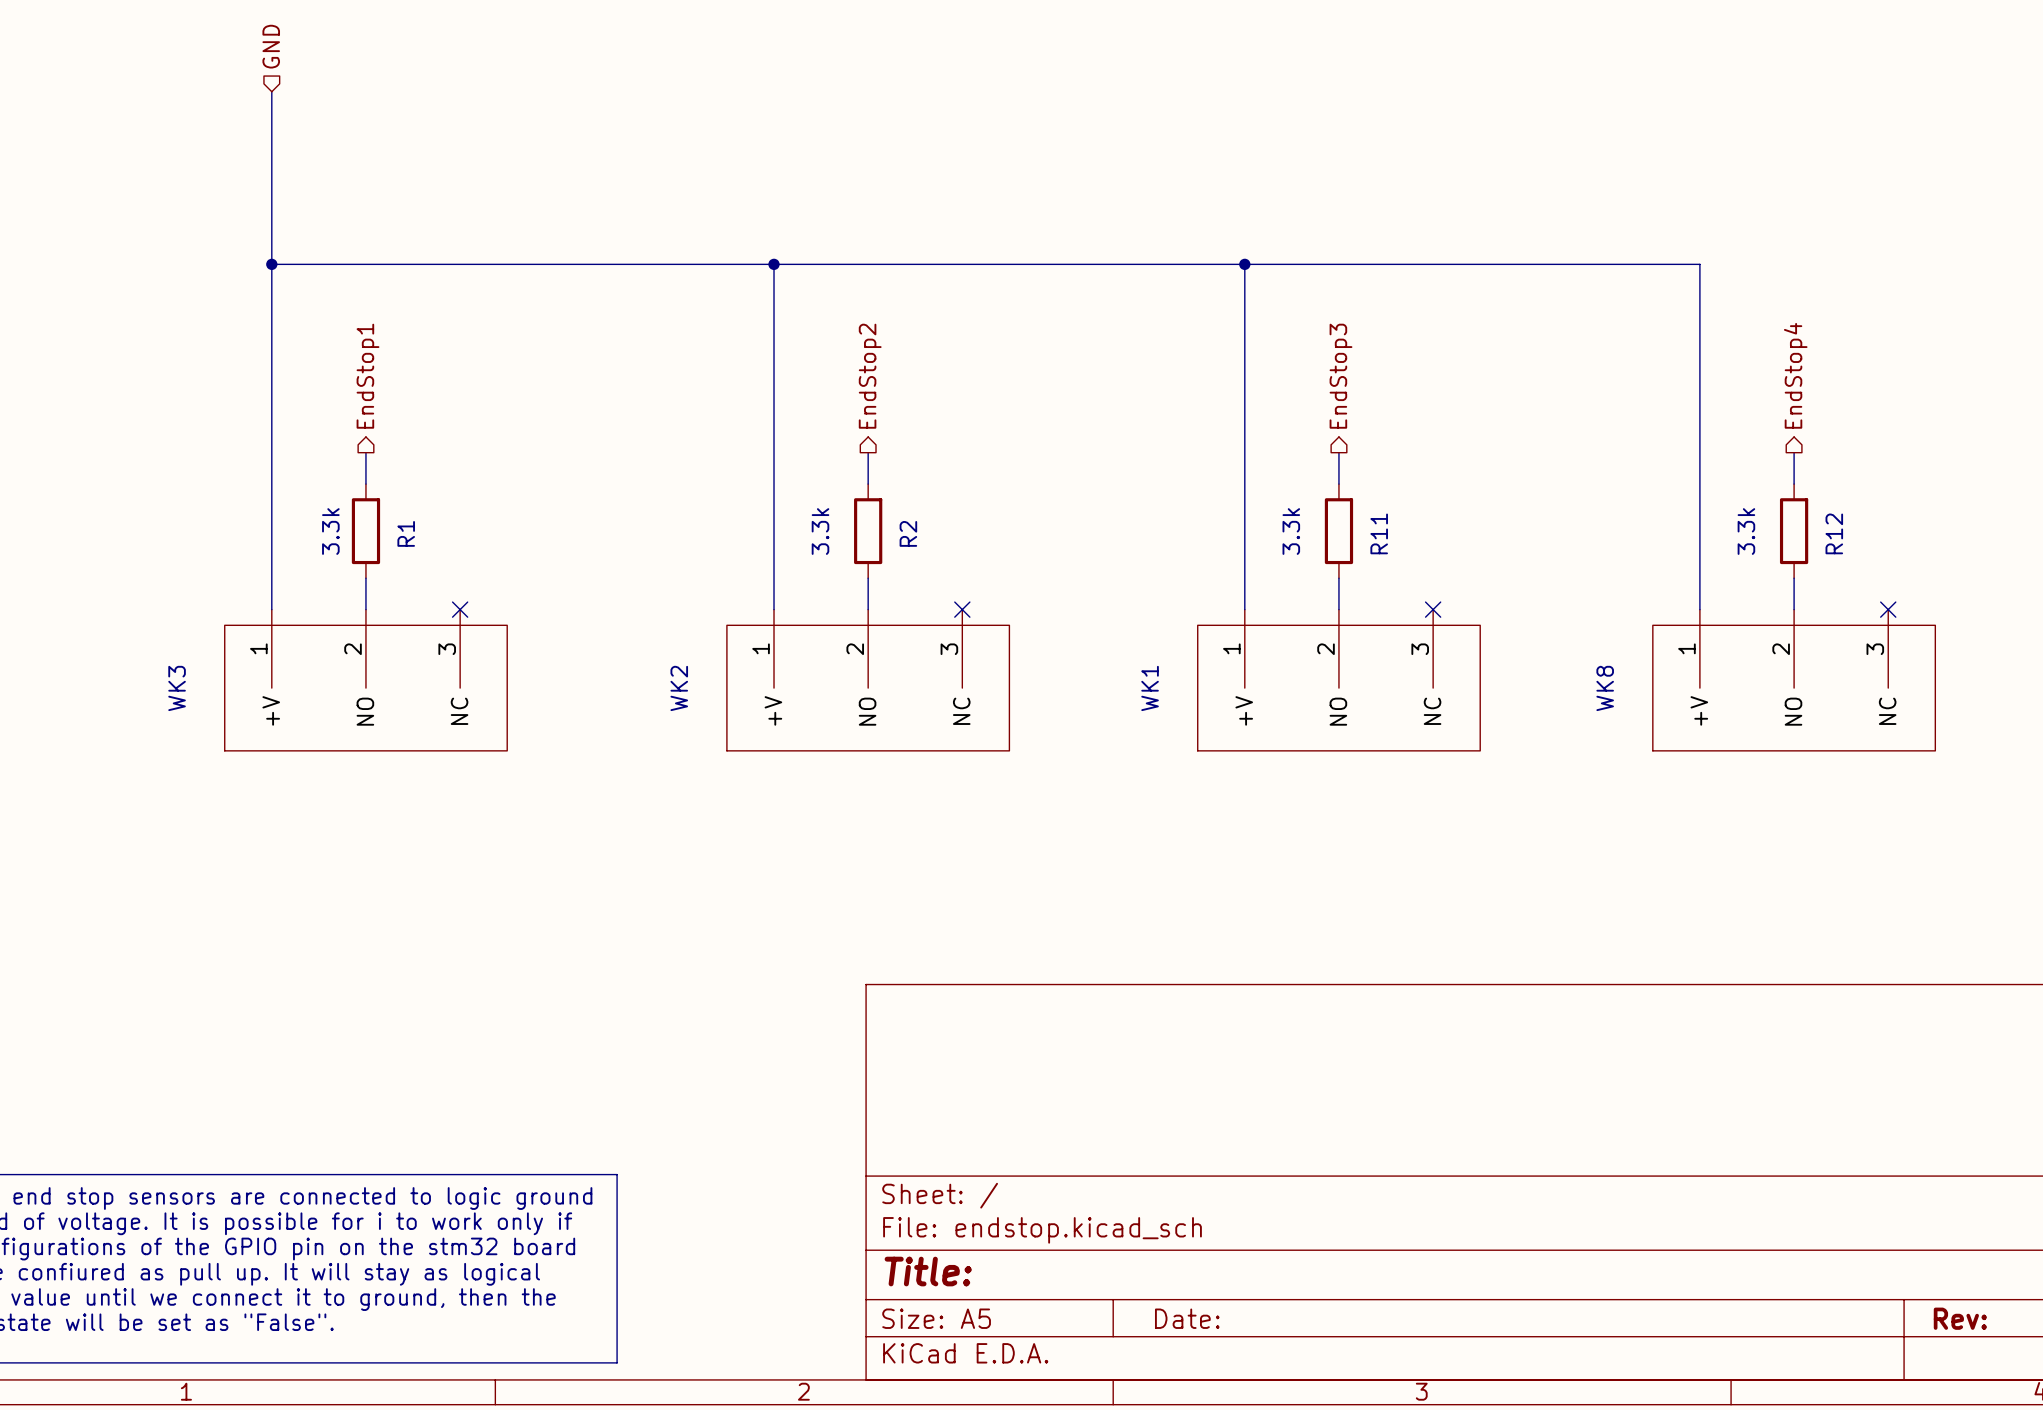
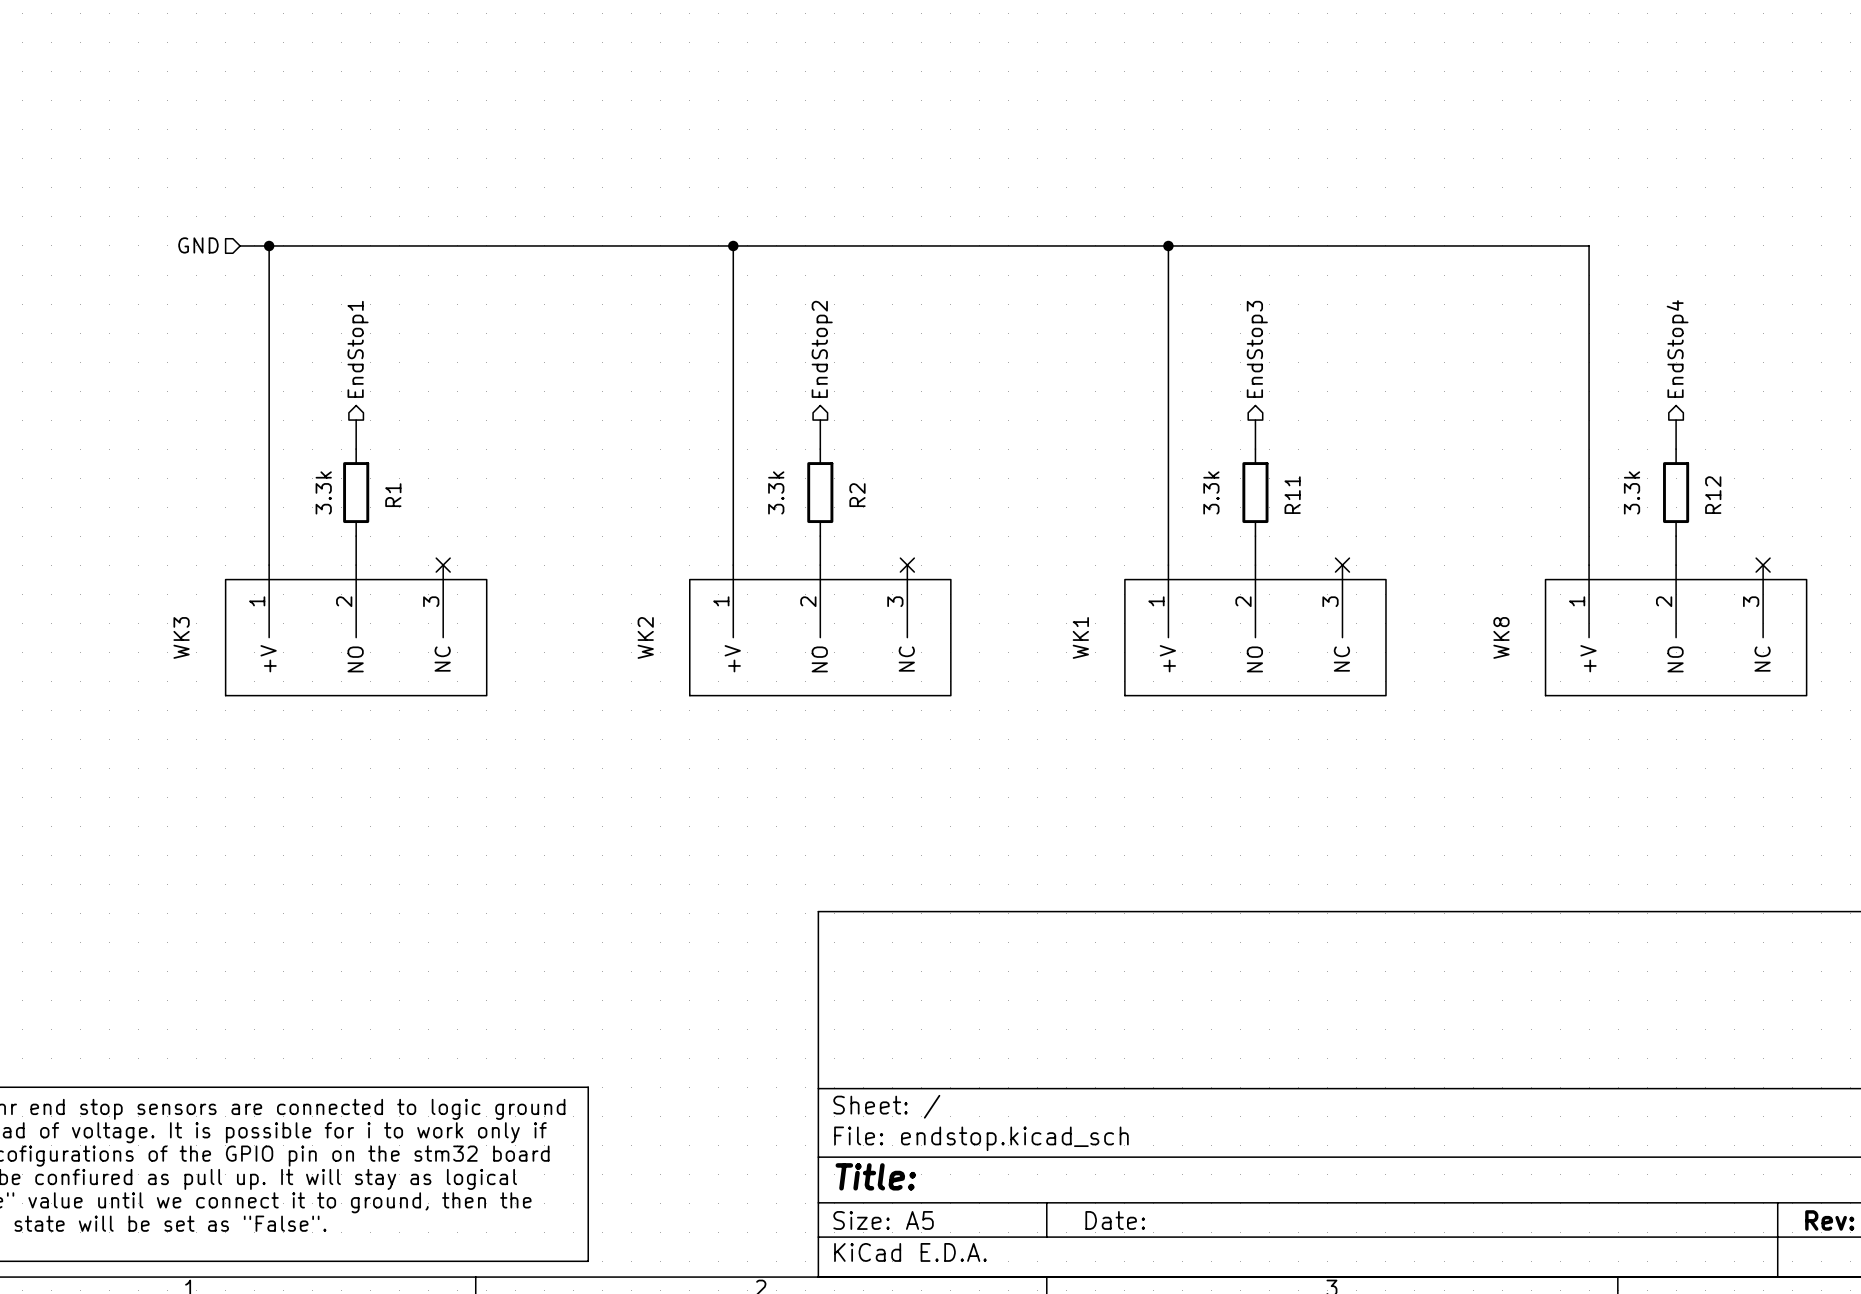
hierarchical label rotation: 0° (271, 46) -> 90° counterclockwise (198, 245)
hierarchical label position: GND (271, 46) -> GND (198, 245)
wire: (271, 91) (271, 264) -> (240, 245) (269, 245)

